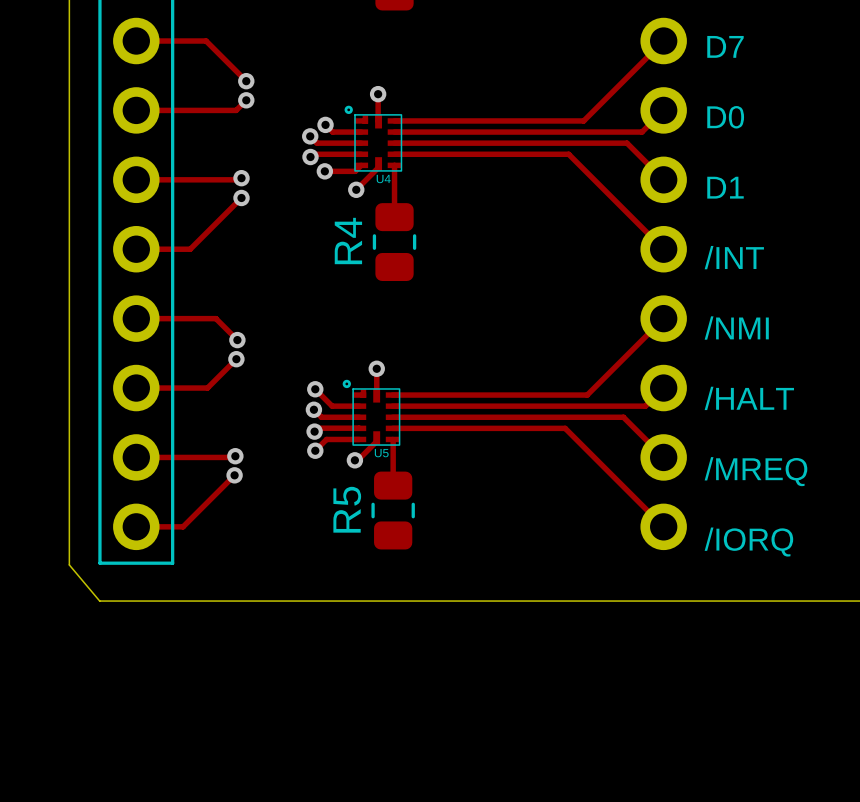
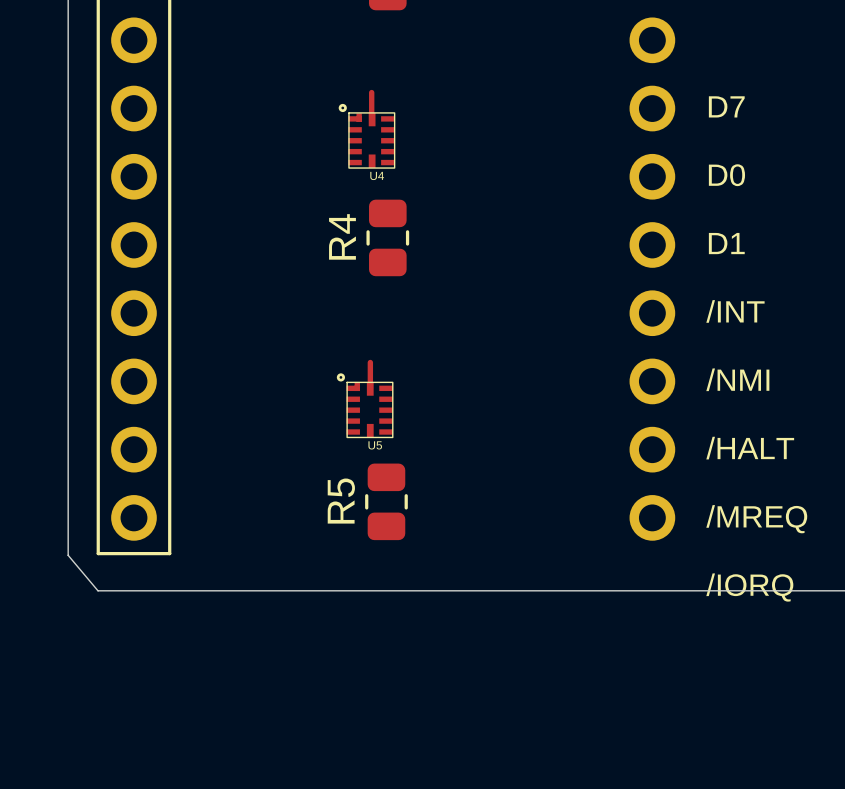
track: (136, 41) (206, 41) (246, 81) -> none
track: (663, 41) (583, 120) (394, 120) -> none
text position: D7 (725, 46) -> D7 (726, 106)
via: (246, 81) -> none
via: (378, 94) -> none
track: (246, 100) (236, 110) (136, 110) -> none
via: (246, 100) -> none
track: (663, 110) (642, 132) (394, 132) -> none
text position: D0 (725, 117) -> D0 (726, 175)
track: (325, 124) (332, 132) (361, 132) -> none
via: (325, 124) -> none
track: (310, 136) (317, 143) (361, 143) -> none
via: (310, 136) -> none
track: (394, 143) (627, 143) (663, 179) -> none
track: (361, 154) (313, 154) (310, 157) -> none
track: (394, 154) (568, 154) (663, 249) -> none
via: (310, 157) -> none
track: (378, 163) (378, 167) (356, 189) -> none
track: (361, 165) (355, 171) (324, 171) -> none
track: (394, 165) (394, 217) -> none
via: (324, 171) -> none
track: (241, 178) (239, 179) (136, 179) -> none
via: (241, 178) -> none
text position: D1 (725, 187) -> D1 (726, 243)
via: (356, 189) -> none
track: (241, 197) (190, 249) (136, 249) -> none
via: (241, 197) -> none
text position: /INT (734, 257) -> /INT (735, 311)
track: (136, 318) (215, 318) (237, 340) -> none
track: (663, 318) (587, 395) (392, 395) -> none
text position: /NMI (736, 328) -> /NMI (737, 379)
via: (237, 340) -> none
track: (236, 359) (207, 388) (136, 388) -> none
via: (236, 359) -> none
via: (376, 368) -> none
track: (663, 388) (645, 406) (392, 406) -> none
track: (315, 389) (332, 406) (359, 406) -> none
via: (315, 389) -> none
text position: /HALT (749, 398) -> /HALT (750, 448)
track: (313, 409) (321, 417) (359, 417) -> none
via: (313, 409) -> none
track: (392, 417) (623, 417) (663, 457) -> none
track: (359, 428) (318, 428) (314, 431) -> none
track: (392, 428) (565, 428) (663, 526) -> none
via: (314, 431) -> none
track: (376, 438) (376, 441) (357, 460) (354, 460) -> none
track: (359, 439) (326, 439) (315, 450) -> none
track: (392, 439) (393, 485) -> none
via: (315, 450) -> none
track: (235, 456) (136, 457) -> none
via: (235, 456) -> none
via: (354, 460) -> none
text position: /MREQ (755, 471) -> /MREQ (756, 519)
track: (234, 475) (183, 526) (136, 526) -> none
via: (234, 475) -> none
text position: /IORQ (748, 542) -> /IORQ (749, 587)

